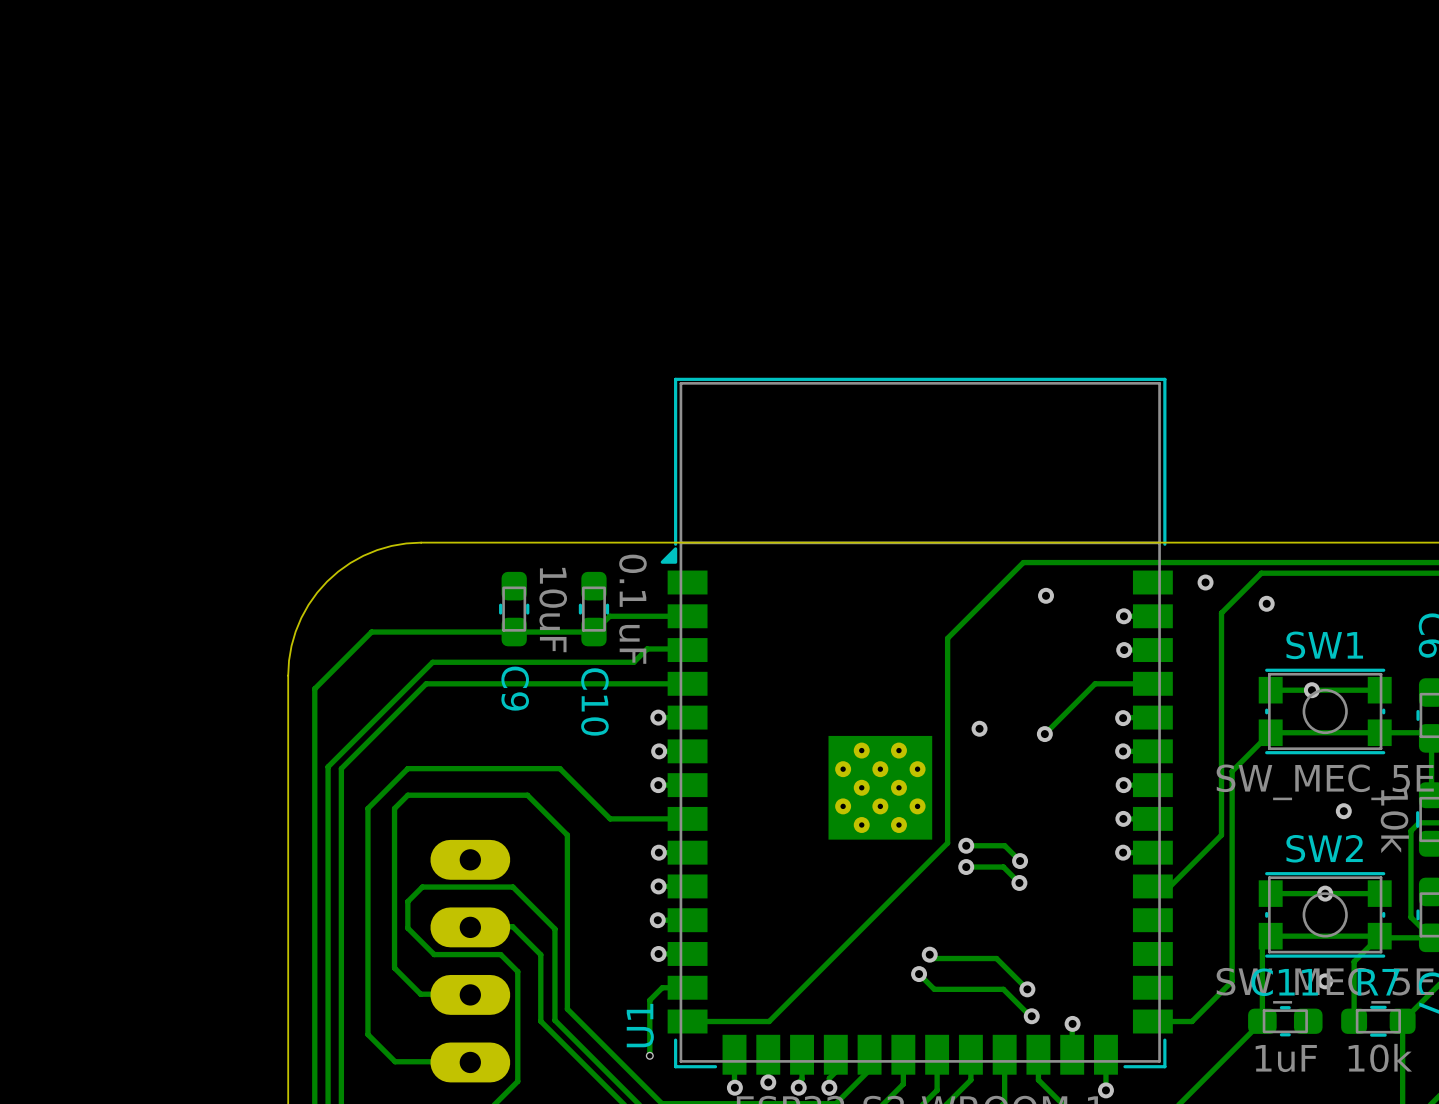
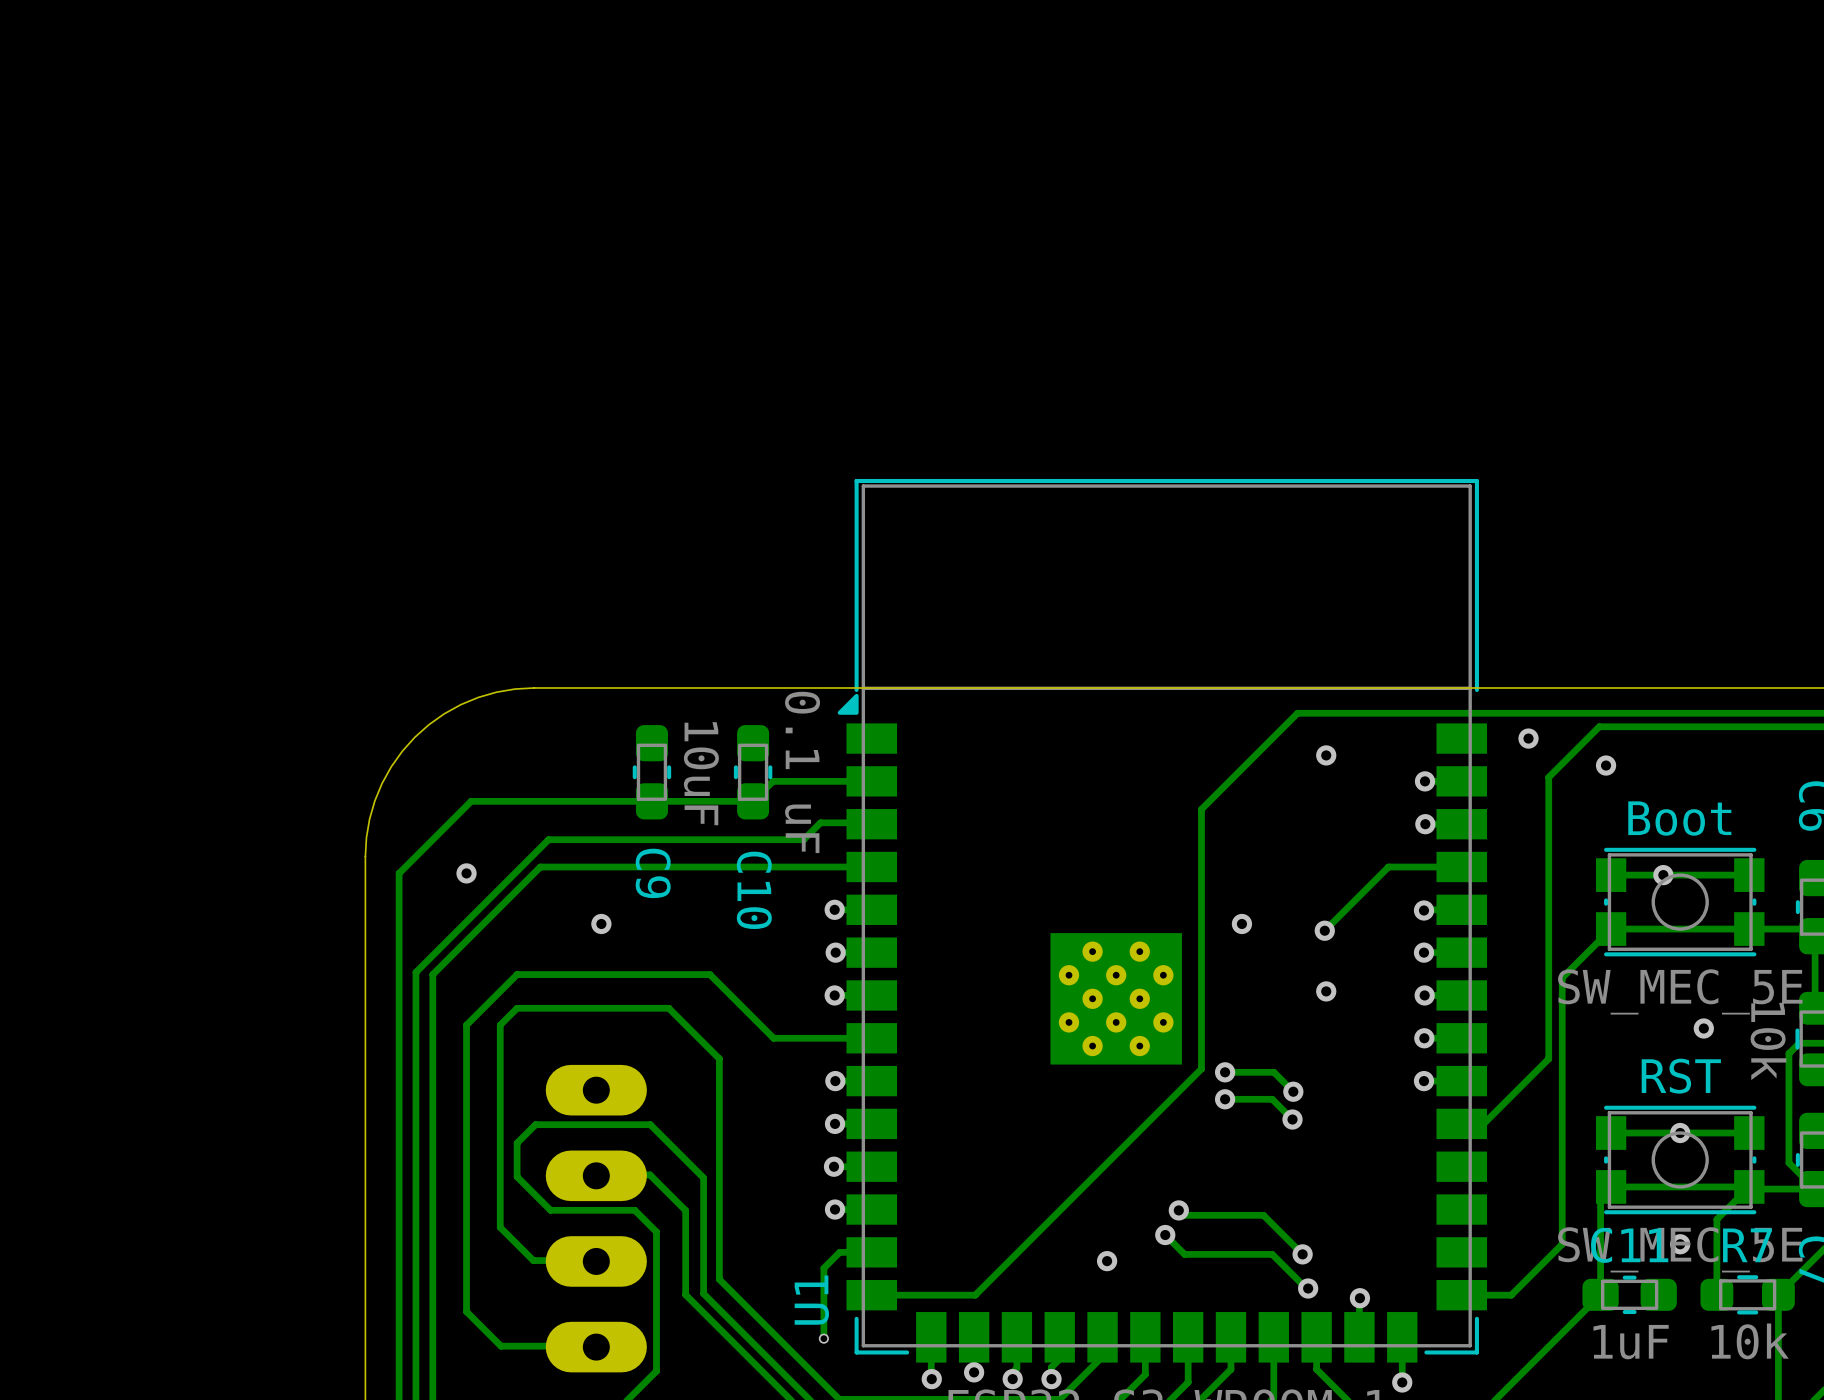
SW1 name: SW1 (1324, 645) -> Boot (1679, 818)
via: none -> (466, 873)
via: none -> (601, 923)
via: none -> (1326, 991)
SW2 name: SW2 (1324, 848) -> RST (1681, 1076)
via: none -> (1107, 1261)

